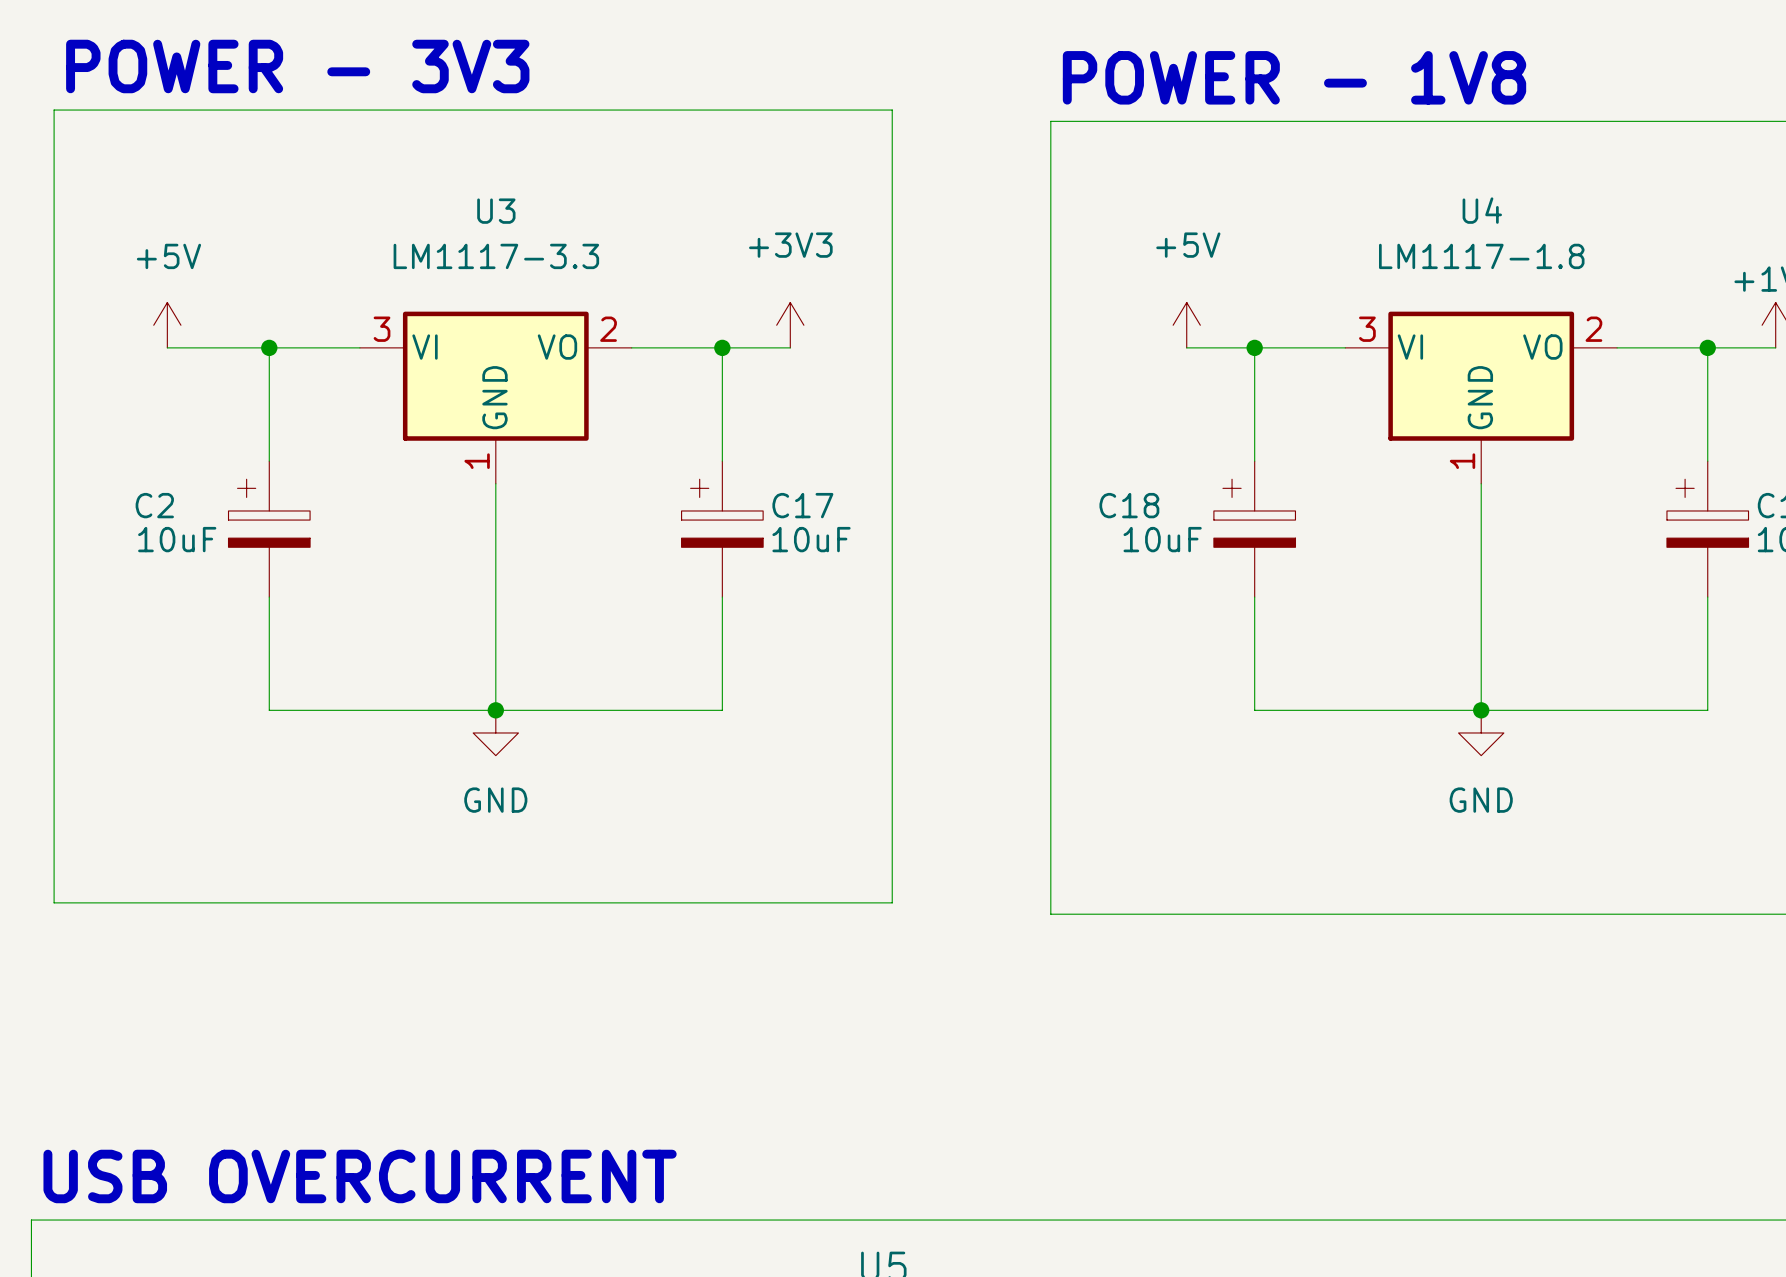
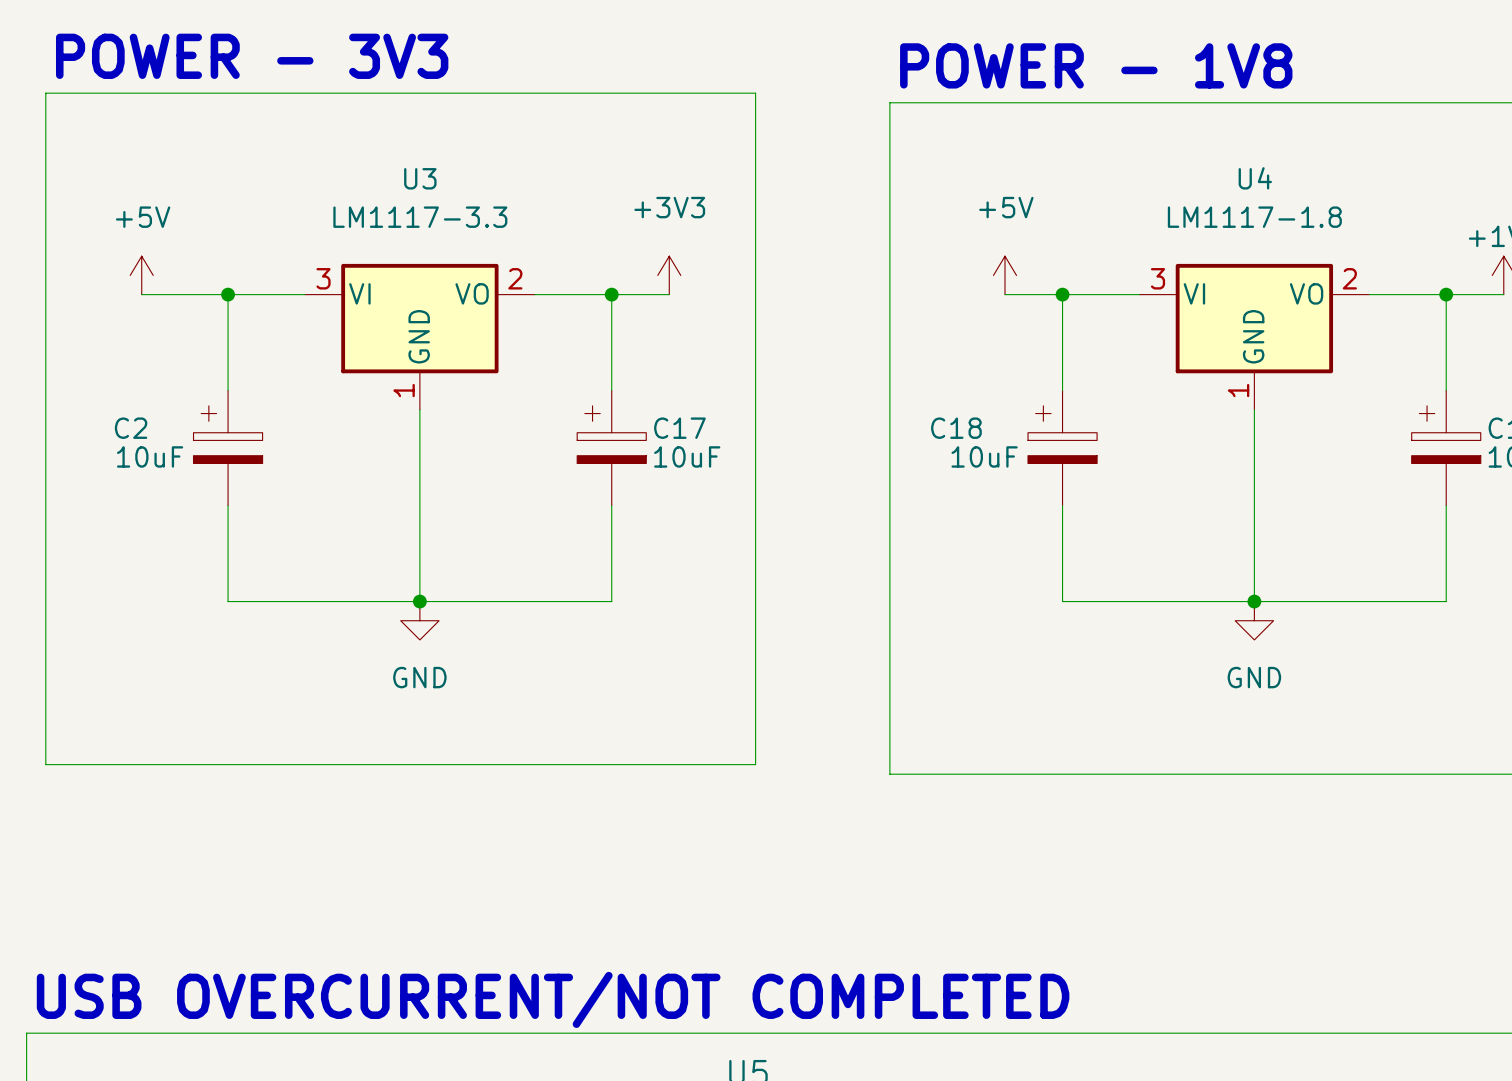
text: USB OVERCURRENT (360, 1176) -> USB OVERCURRENT/NOT COMPLETED (553, 999)

